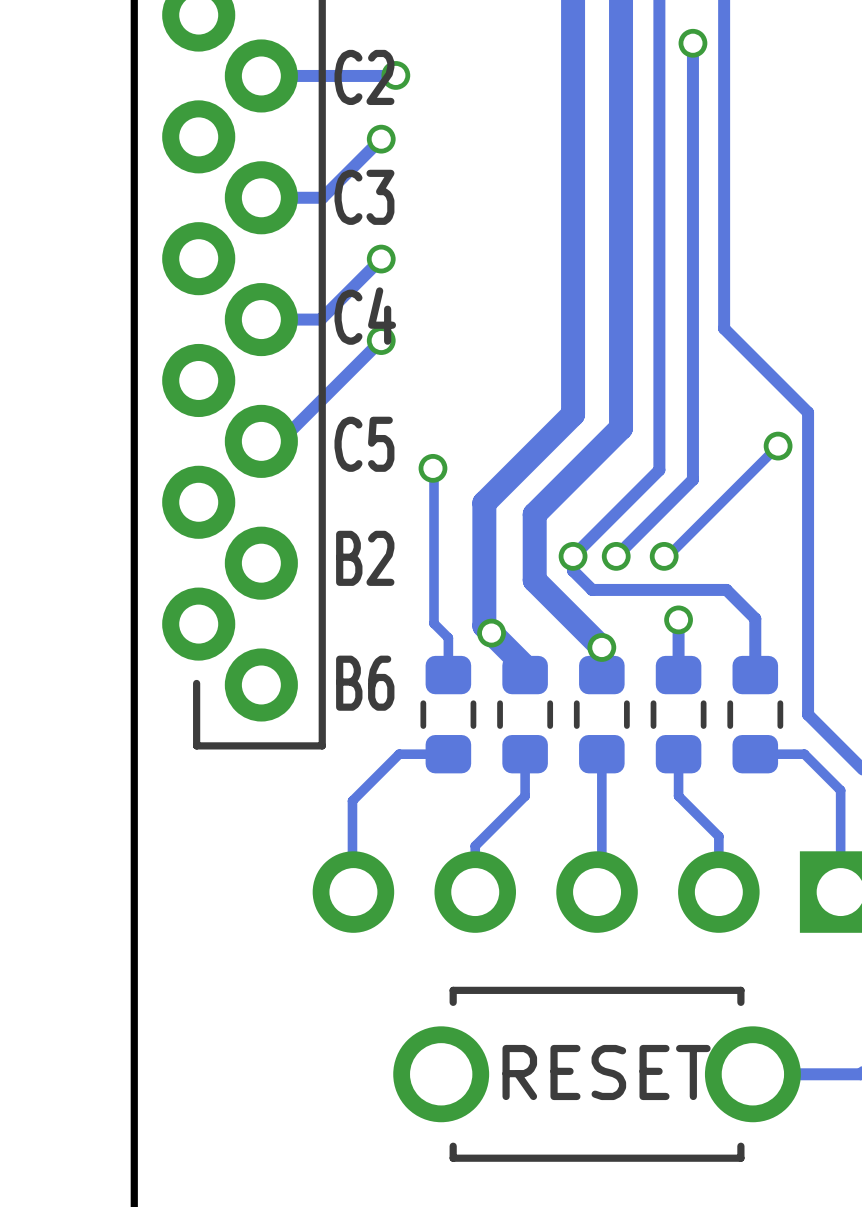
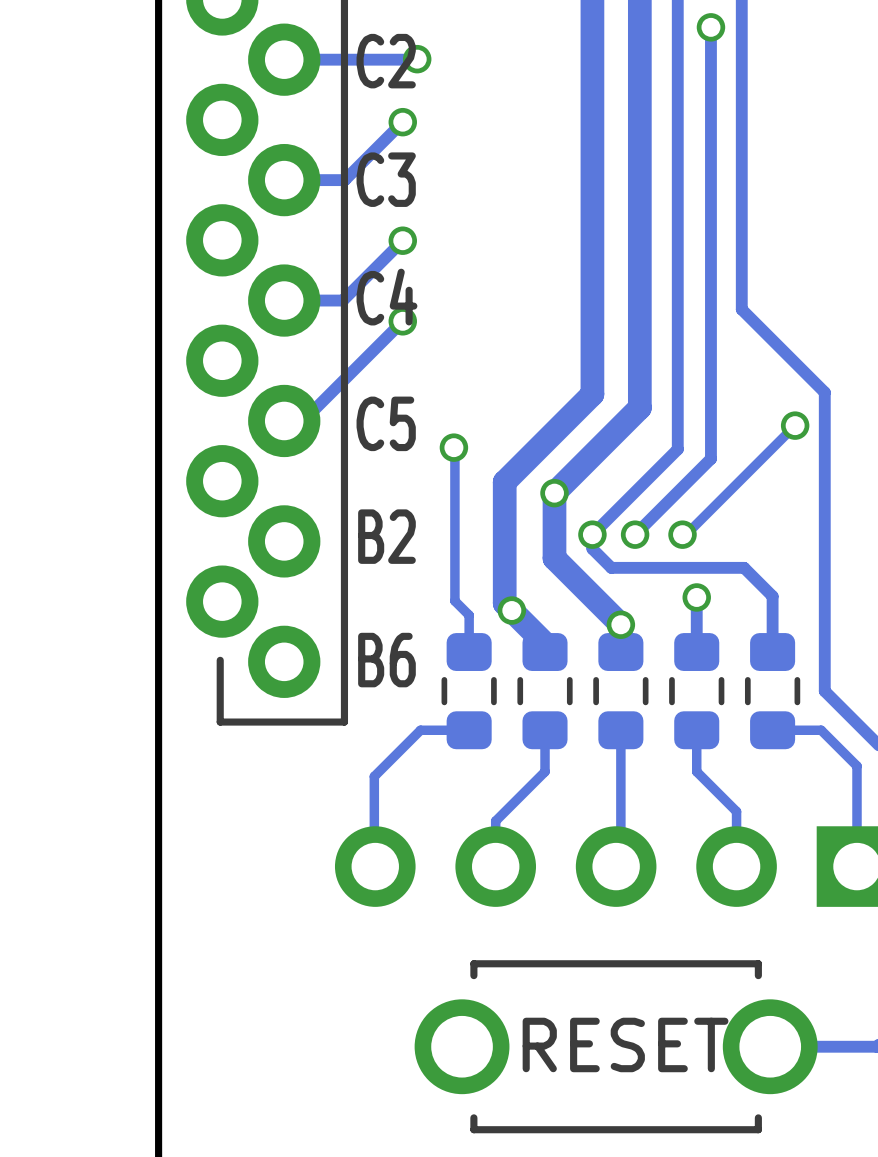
via: none -> (554, 493)

